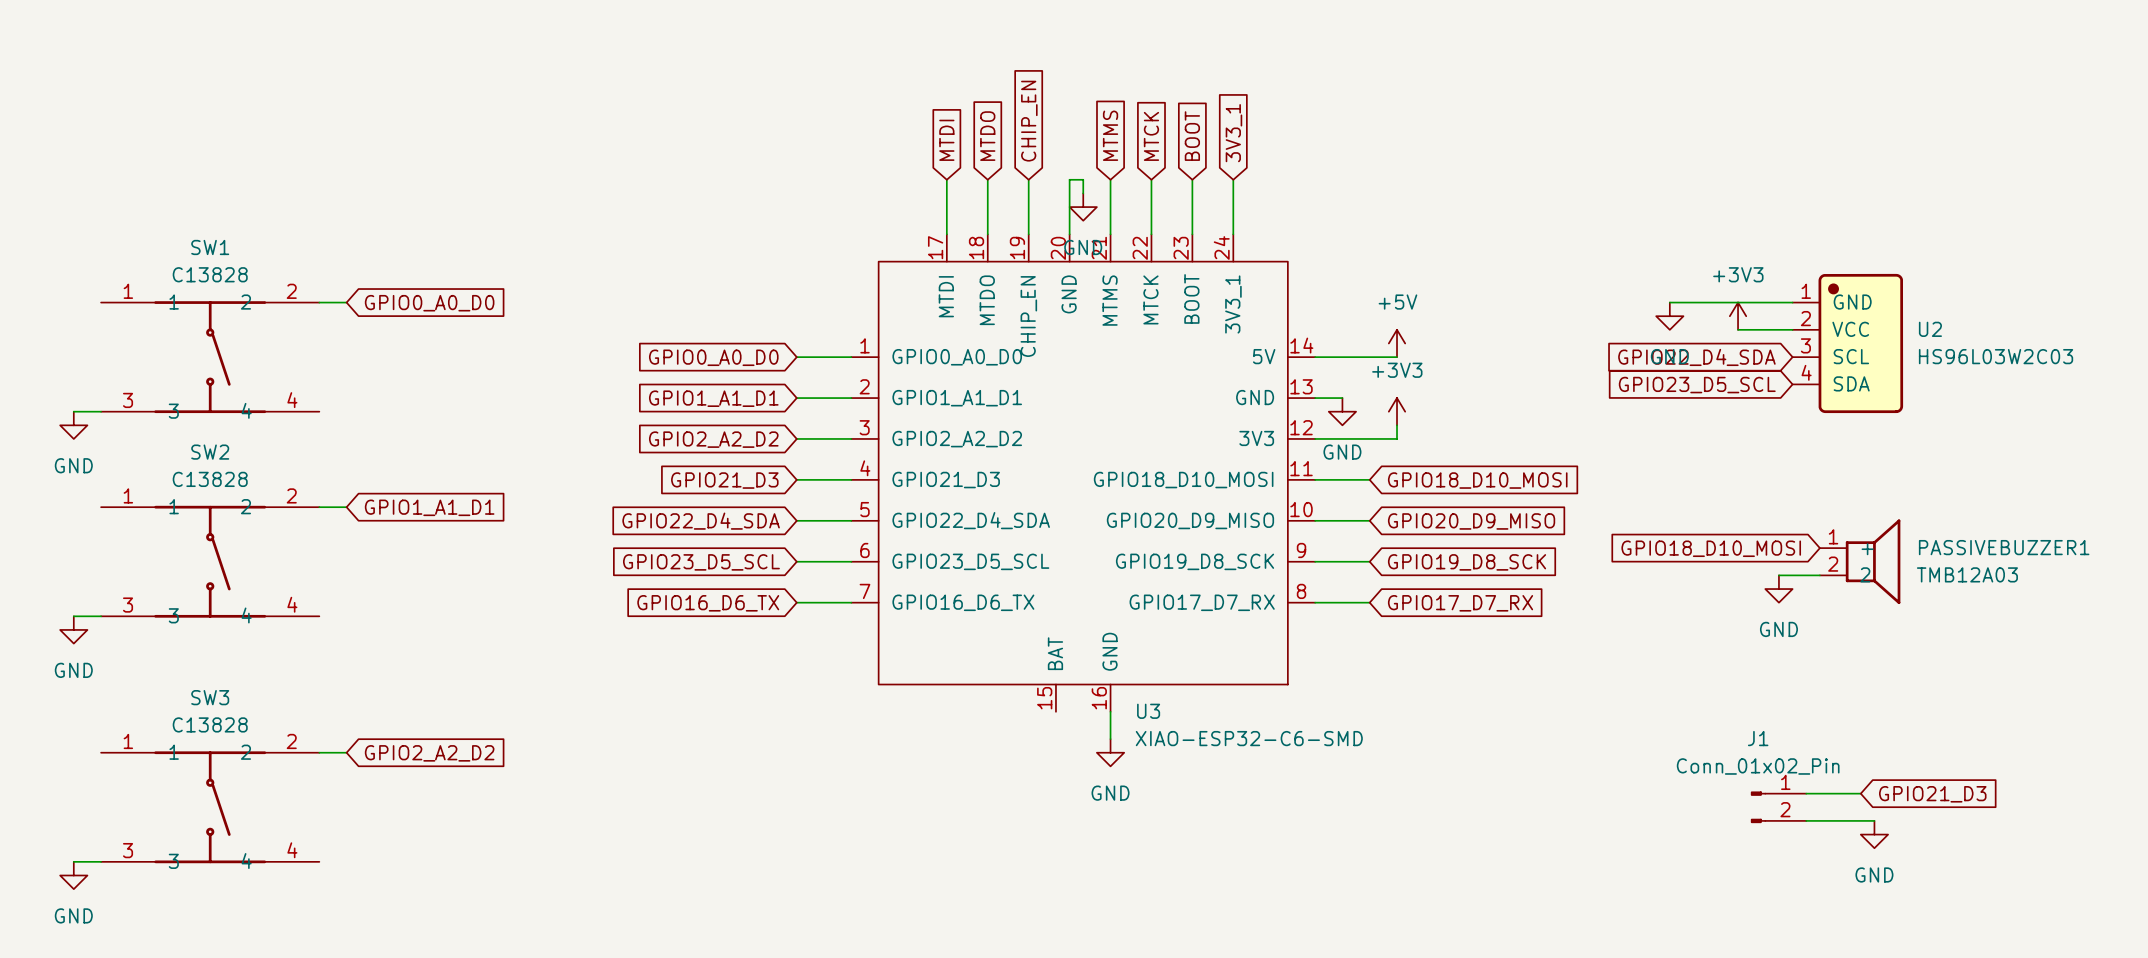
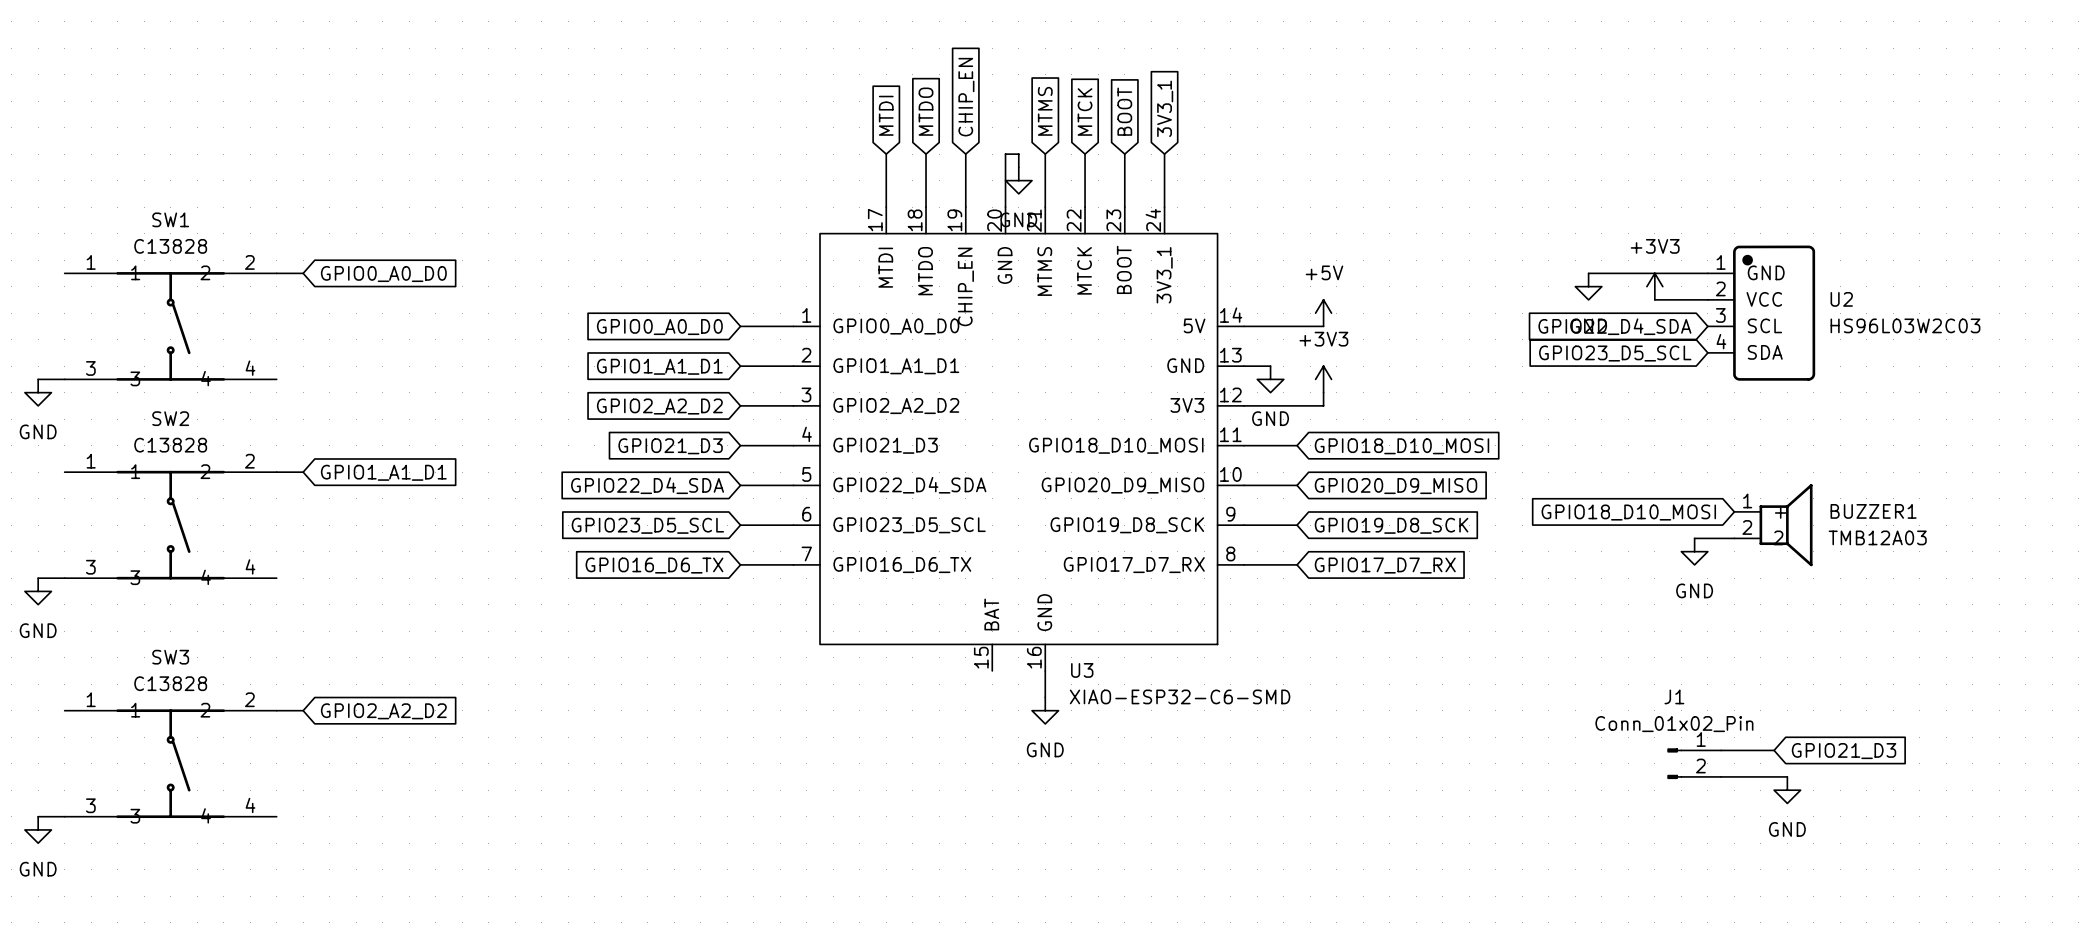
PASSIVEBUZZER1 name: PASSIVEBUZZER1 (2004, 547) -> BUZZER1 (1873, 511)

